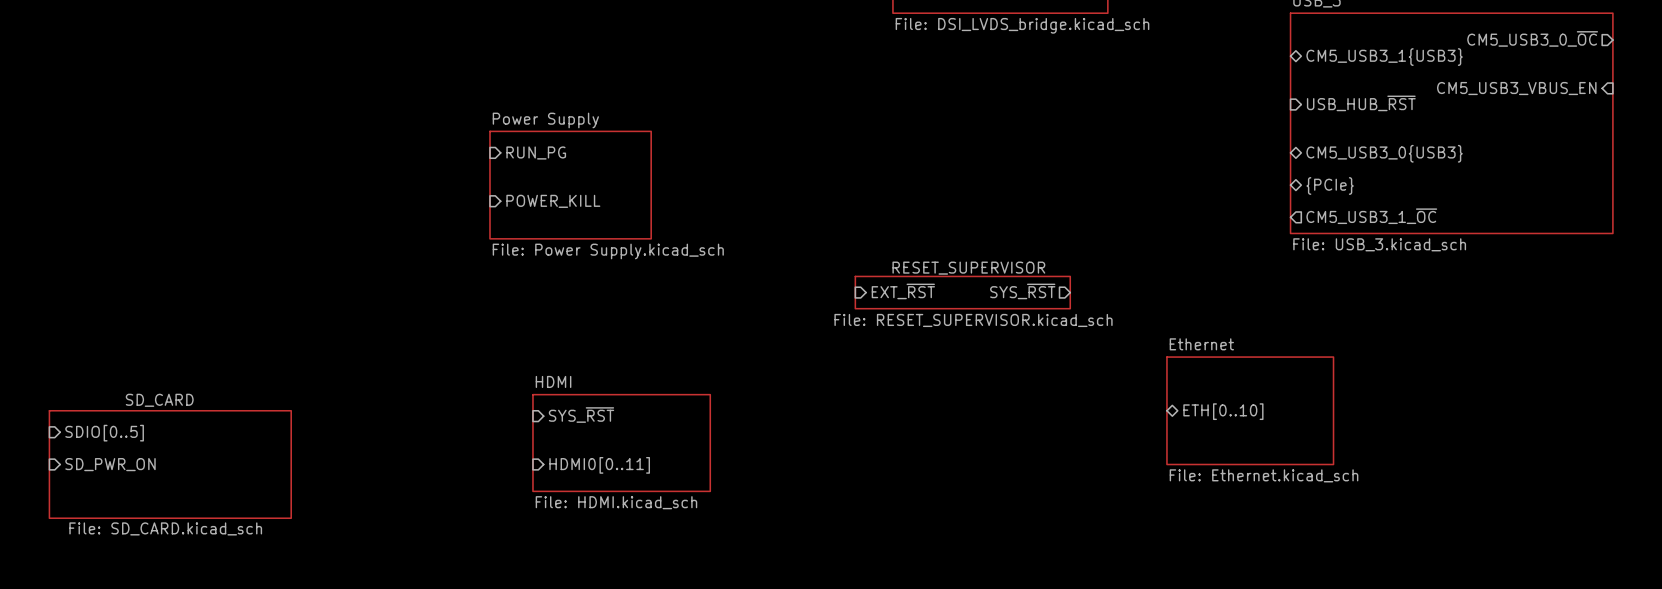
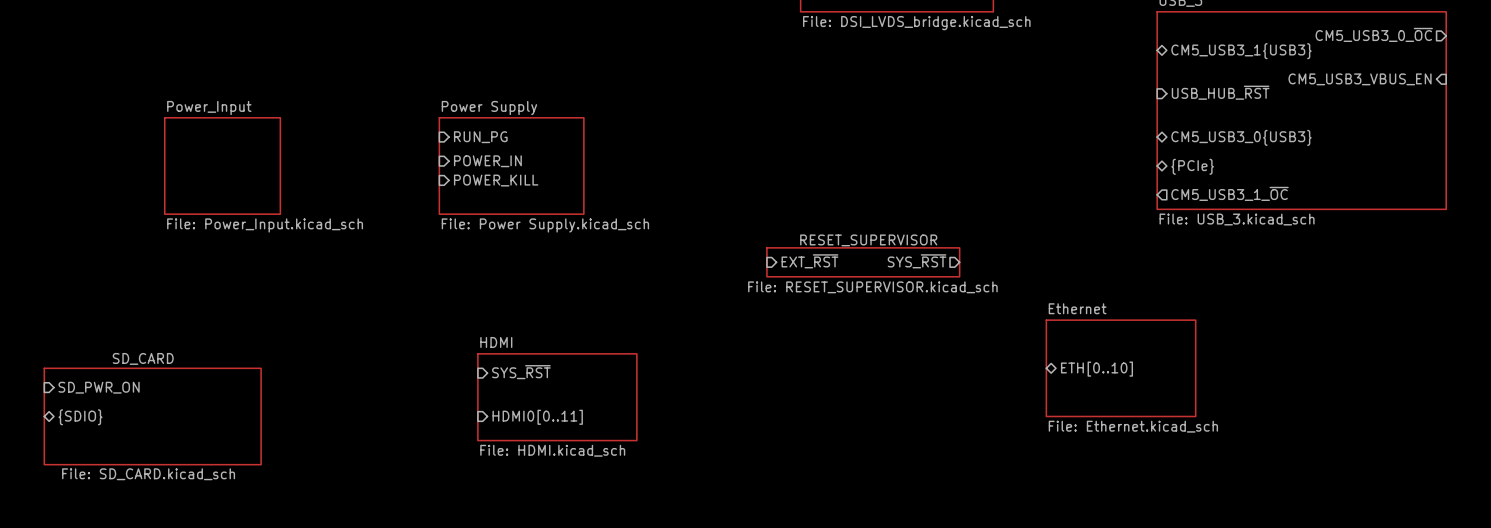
sheet pin: none -> POWER_IN (487, 161)
sheet Power_Input: none -> File: Power_Input.kicad_sch (222, 165)
sheet pin: SDIO[0..5] (104, 433) -> SD_PWR_ON (99, 387)
sheet pin shape: input (110, 464) -> bidirectional (80, 417)
sheet pin: SD_PWR_ON (110, 464) -> {SDIO} (80, 417)

